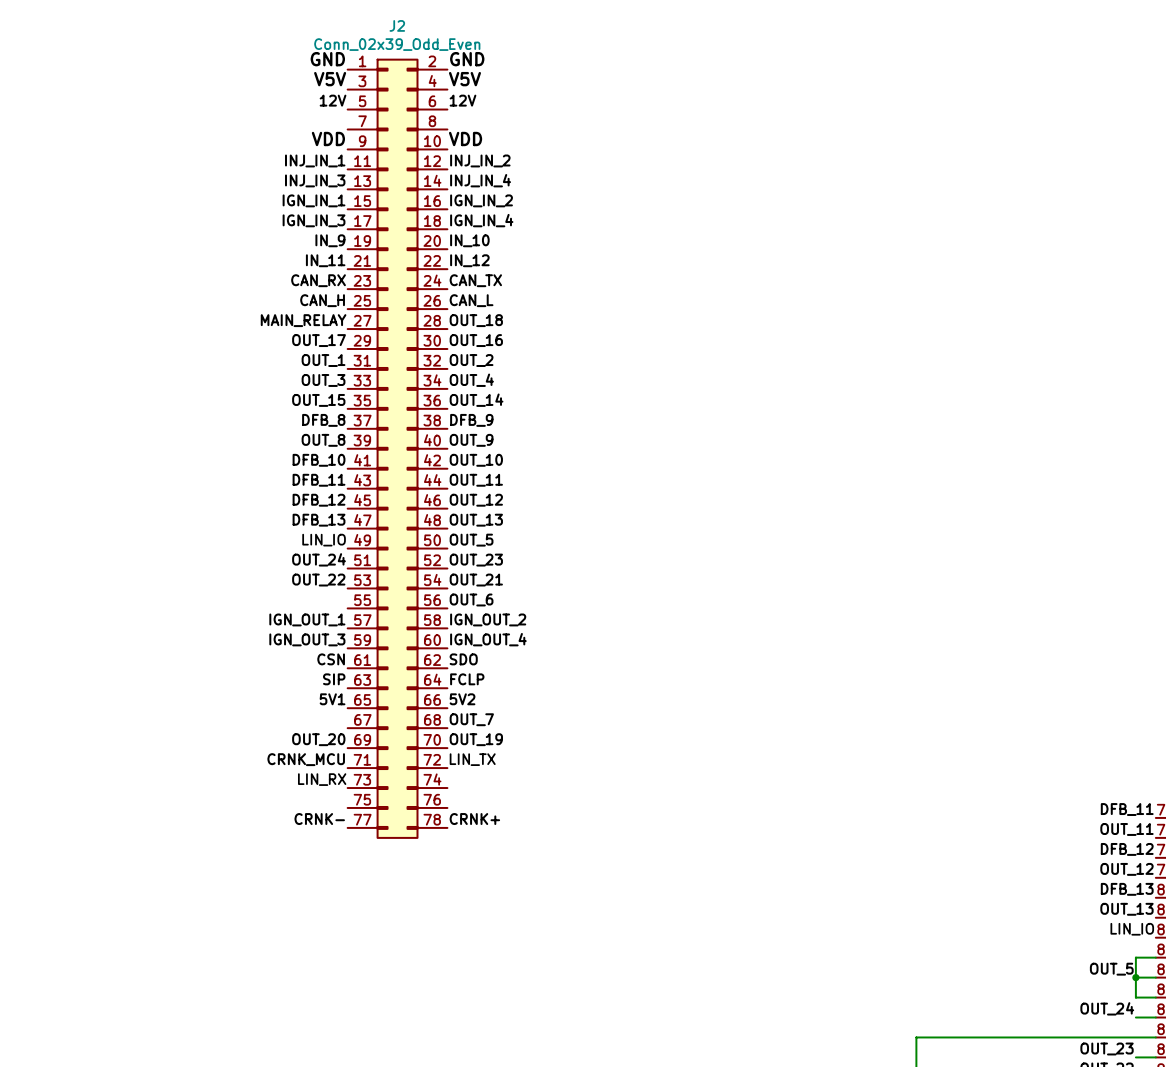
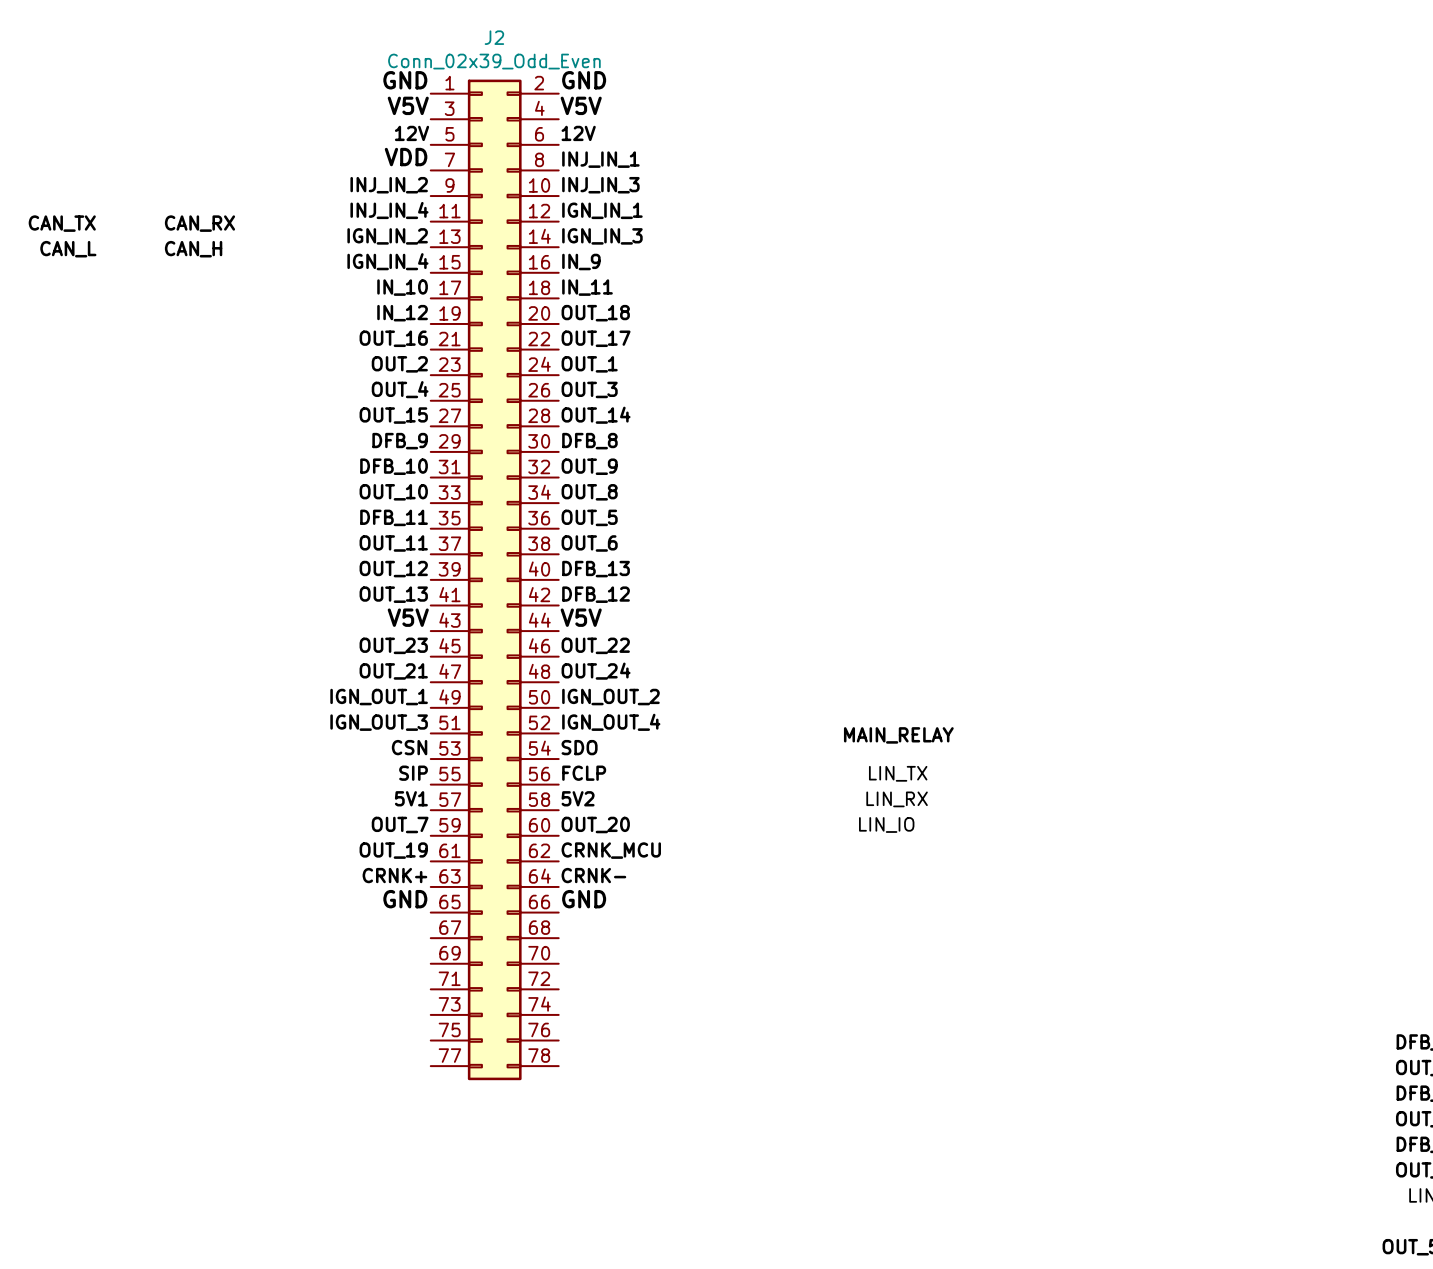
label: none -> VDD (406, 157)
label: none -> INJ_IN_1 (600, 159)
label: VDD (328, 138) -> INJ_IN_2 (389, 185)
label: VDD (465, 138) -> INJ_IN_3 (600, 185)
label: INJ_IN_1 (315, 160) -> INJ_IN_4 (389, 210)
label: INJ_IN_2 (480, 160) -> IGN_IN_1 (602, 210)
label: none -> CAN_TX (62, 223)
label: none -> CAN_RX (199, 223)
label: INJ_IN_3 (315, 180) -> IGN_IN_2 (387, 236)
label: INJ_IN_4 (480, 180) -> IGN_IN_3 (602, 236)
label: none -> CAN_L (68, 249)
label: none -> CAN_H (193, 249)
label: IGN_IN_1 (314, 200) -> IGN_IN_4 (387, 261)
label: IGN_IN_2 (481, 200) -> IN_9 (581, 261)
label: IGN_IN_3 (314, 220) -> IN_10 (402, 287)
label: IGN_IN_4 (481, 220) -> IN_11 (587, 287)
label: IN_9 (330, 240) -> IN_12 (402, 313)
label: IN_10 (469, 240) -> OUT_18 (595, 313)
label: IN_11 (325, 260) -> OUT_16 (393, 338)
label: IN_12 (469, 260) -> OUT_17 (596, 338)
label: CAN_RX (318, 280) -> OUT_2 (399, 364)
label: CAN_TX (475, 280) -> OUT_1 (589, 364)
label: CAN_H (322, 300) -> OUT_4 (400, 389)
label: CAN_L (471, 300) -> OUT_3 (589, 389)
label: MAIN_RELAY (303, 320) -> OUT_15 (393, 415)
label: OUT_18 (476, 320) -> OUT_14 (596, 415)
label: OUT_17 (319, 340) -> DFB_9 (400, 441)
label: OUT_16 (476, 340) -> DFB_8 (589, 441)
label: OUT_1 (323, 360) -> DFB_10 (394, 466)
label: OUT_2 (471, 360) -> OUT_9 (589, 466)
label: OUT_3 (323, 380) -> OUT_10 (393, 492)
label: OUT_4 (471, 380) -> OUT_8 (589, 492)
label: OUT_15 (318, 400) -> DFB_11 (394, 517)
label: OUT_14 (476, 400) -> OUT_5 (589, 517)
label: DFB_8 (323, 420) -> OUT_11 (393, 543)
label: DFB_9 (471, 420) -> OUT_6 (589, 543)
label: OUT_8 (323, 440) -> OUT_12 (393, 569)
label: OUT_9 (471, 440) -> DFB_13 (596, 569)
label: DFB_10 (319, 460) -> OUT_13 (393, 594)
label: OUT_10 (476, 460) -> DFB_12 (596, 594)
label: DFB_11 (319, 480) -> V5V (408, 617)
label: OUT_11 (476, 480) -> V5V (581, 617)
label: DFB_12 (319, 500) -> OUT_23 (393, 645)
label: OUT_12 (476, 500) -> OUT_22 (595, 645)
label: DFB_13 (319, 520) -> OUT_21 (393, 671)
label: OUT_13 (476, 520) -> OUT_24 (596, 671)
label: LIN_IO (324, 540) -> IGN_OUT_1 (379, 697)
label: OUT_5 (471, 540) -> IGN_OUT_2 (610, 697)
label: OUT_24 (319, 559) -> IGN_OUT_3 (379, 722)
label: OUT_23 (476, 560) -> IGN_OUT_4 (611, 722)
label: none -> MAIN_RELAY (898, 735)
label: OUT_22 (318, 580) -> CSN (409, 747)
label: OUT_21 (476, 580) -> SDO (579, 747)
label: none -> SIP (413, 773)
label: OUT_6 (471, 599) -> FCLP (584, 773)
label: none -> LIN_TX (898, 773)
label: IGN_OUT_1 (307, 619) -> 5V1 (411, 798)
label: IGN_OUT_2 (488, 619) -> 5V2 (578, 798)
label: none -> LIN_RX (897, 799)
label: IGN_OUT_3 (307, 639) -> OUT_7 (400, 824)
label: IGN_OUT_4 (488, 639) -> OUT_20 (595, 824)
label: none -> LIN_IO (886, 824)
label: CSN (331, 659) -> OUT_19 (393, 850)
label: SDO (463, 659) -> CRNK_MCU (611, 850)
label: SIP (334, 679) -> CRNK+ (394, 875)
label: FCLP (467, 679) -> CRNK- (593, 875)
label: 5V1 (332, 699) -> GND (405, 899)
label: 5V2 (462, 699) -> GND (584, 899)
label: OUT_7 (471, 719) -> none
label: OUT_20 (318, 739) -> none
label: OUT_19 (476, 739) -> none
label: CRNK_MCU (306, 759) -> none
label: LIN_TX (472, 759) -> none
label: LIN_RX (322, 779) -> none
label: CRNK- (319, 819) -> none
label: CRNK+ (474, 819) -> none

